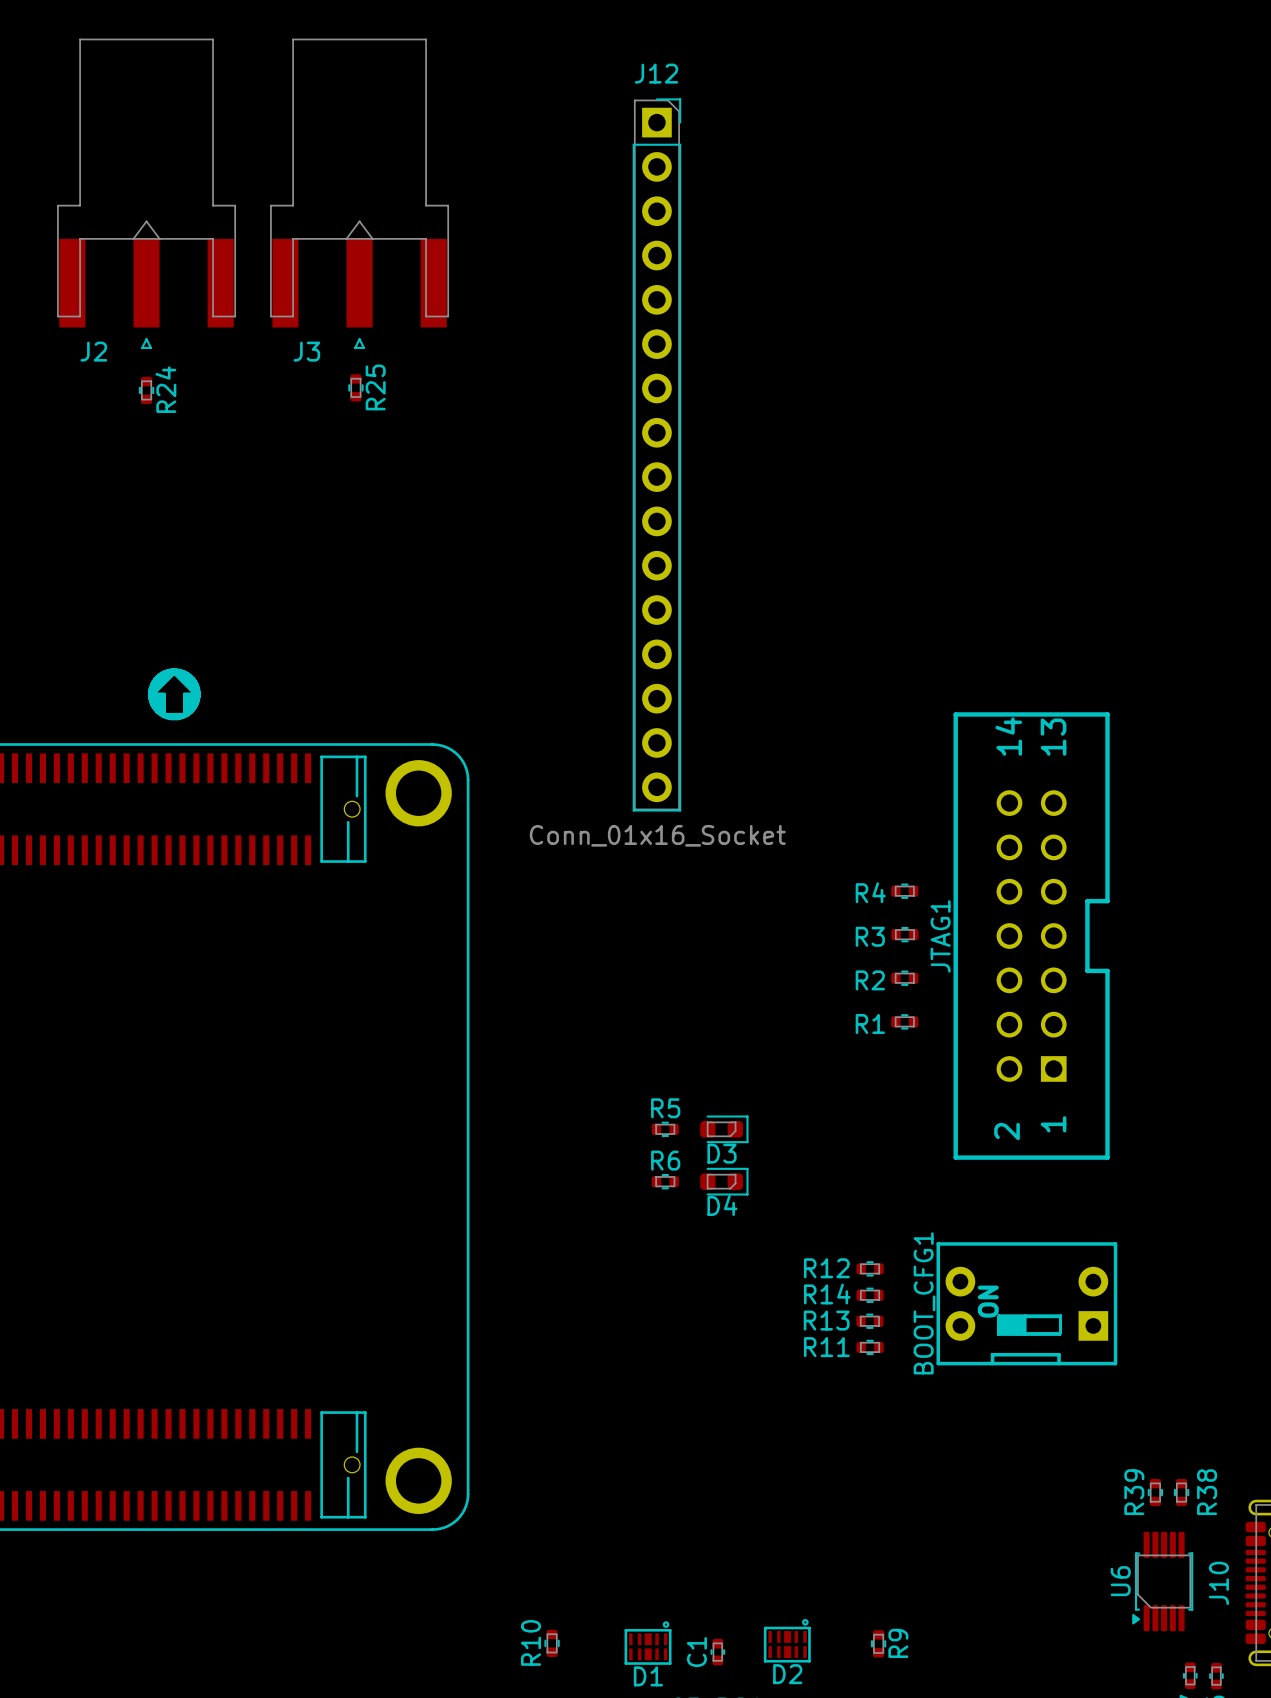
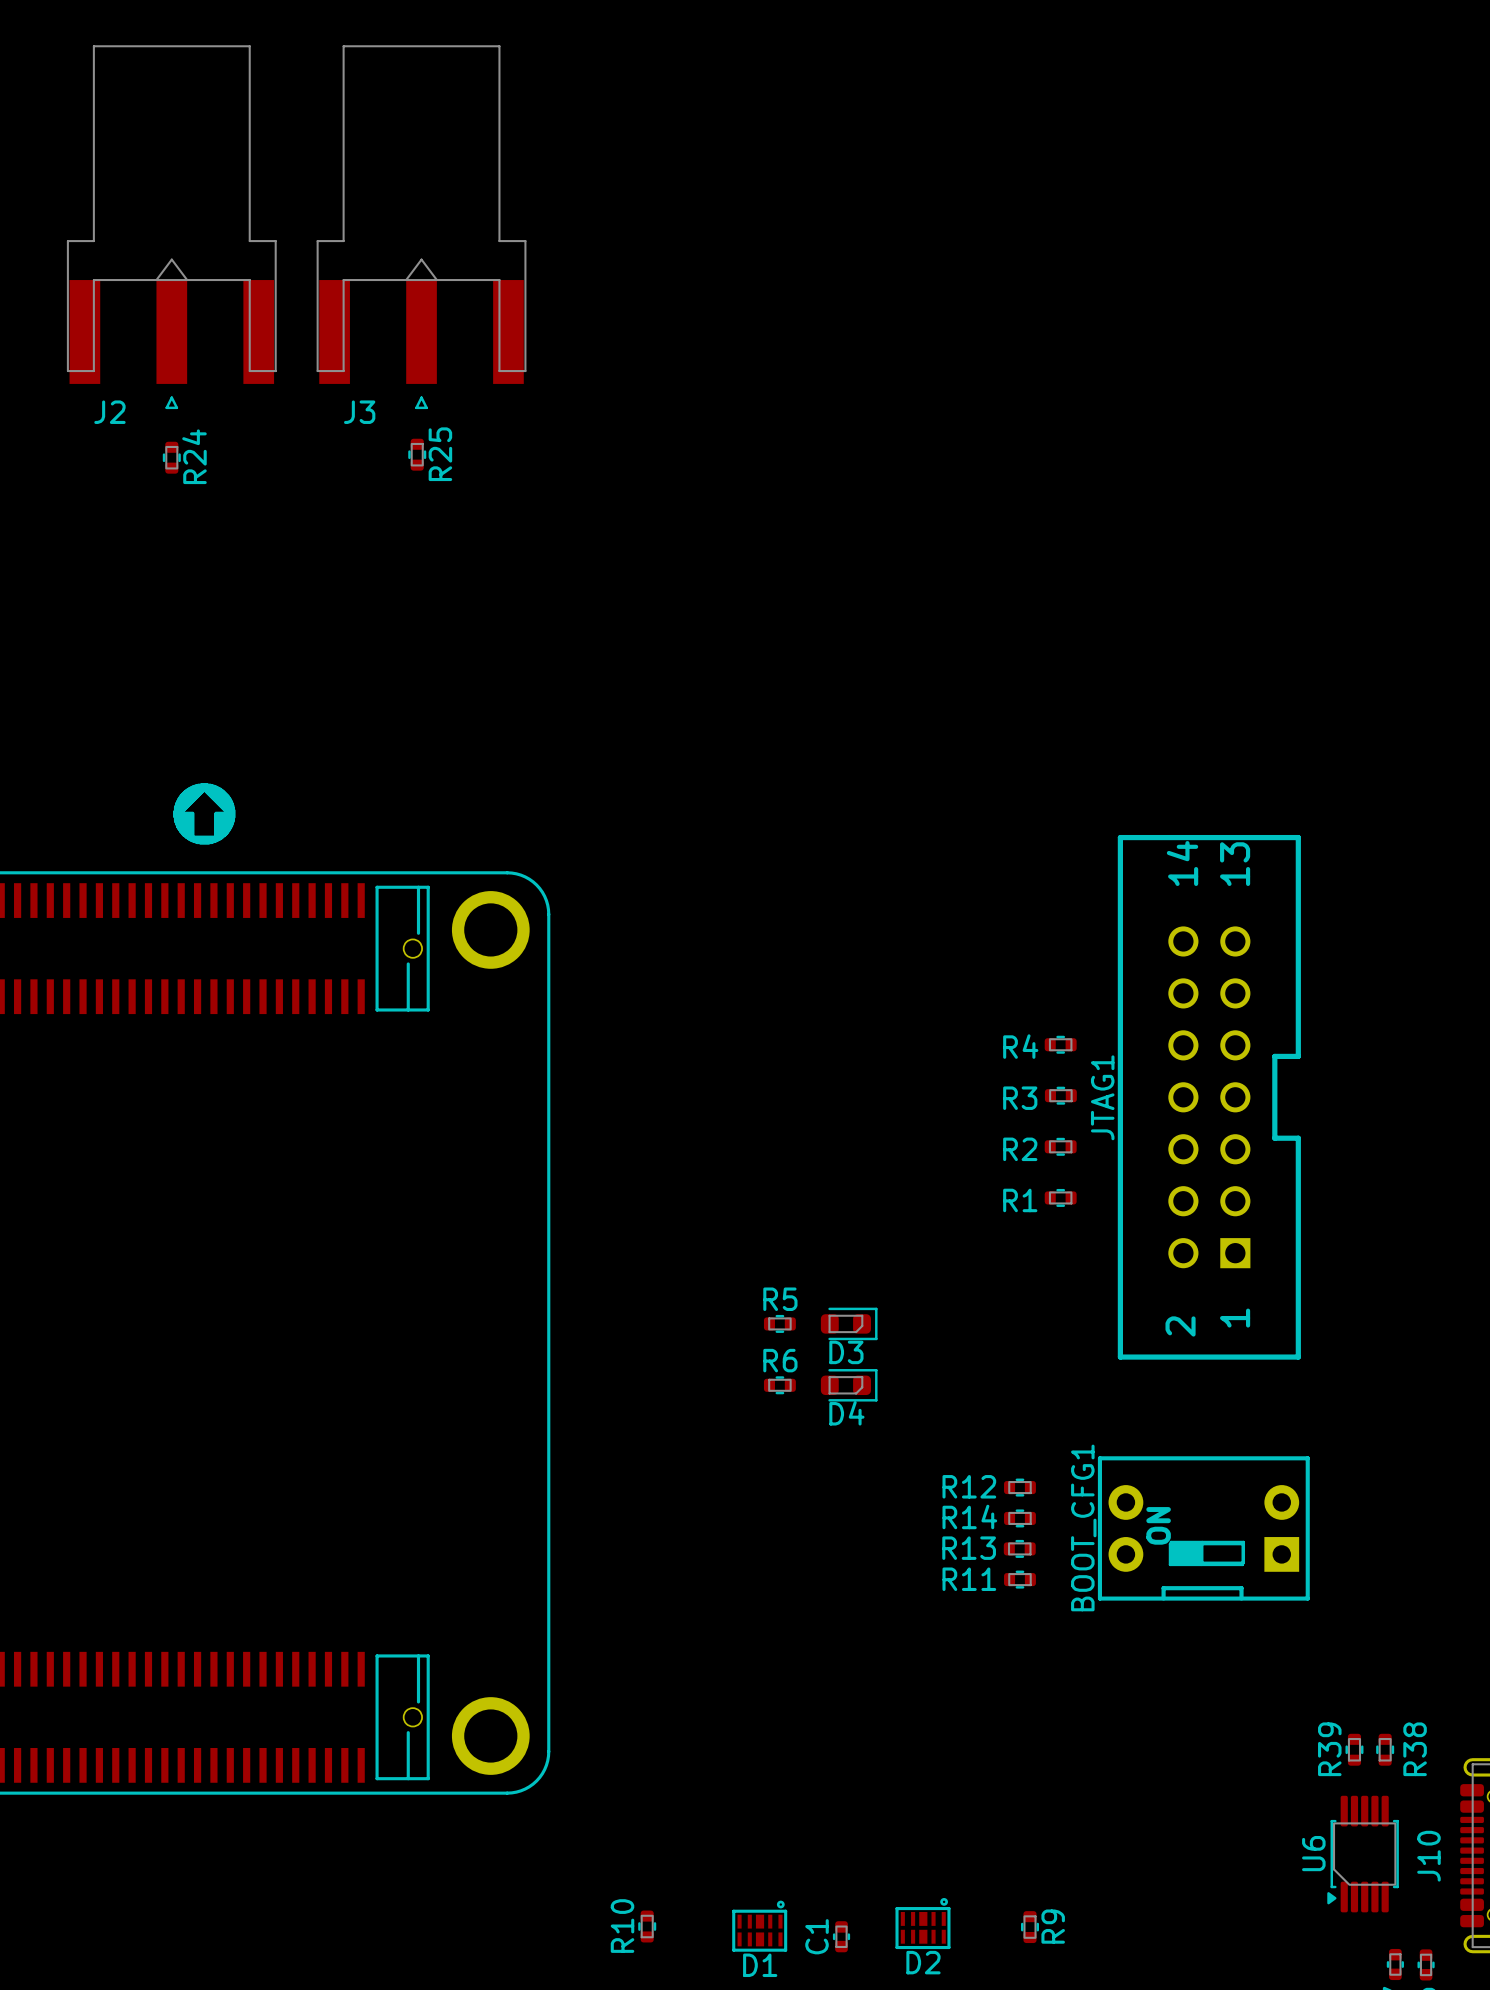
J12: Conn_01x16_Socket (656, 454) -> none

